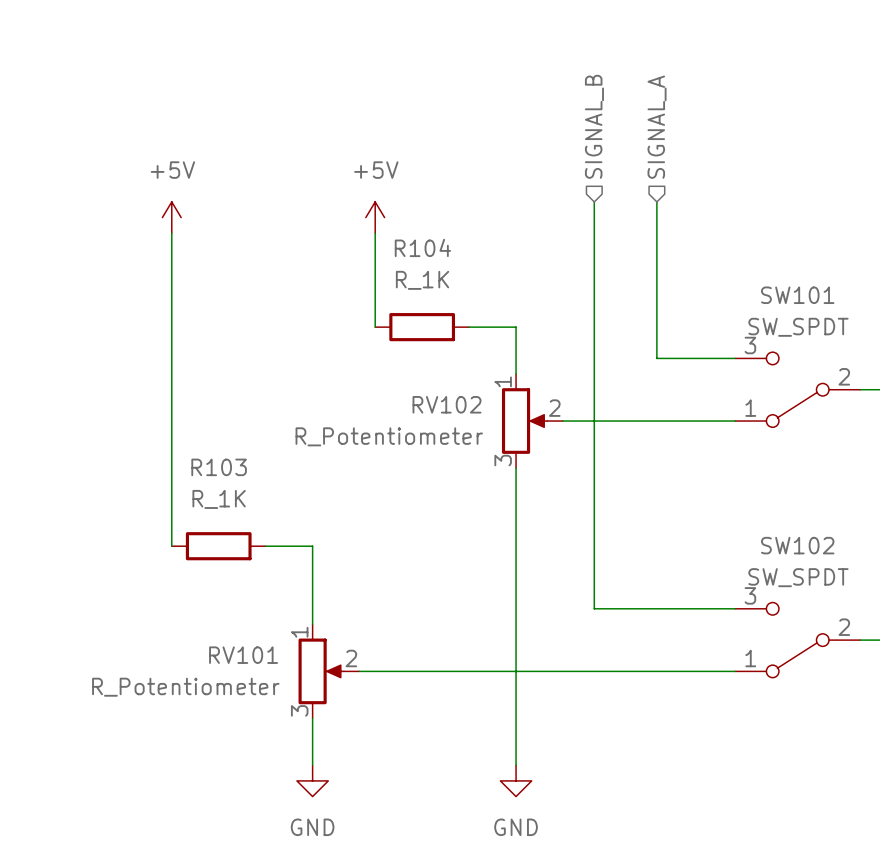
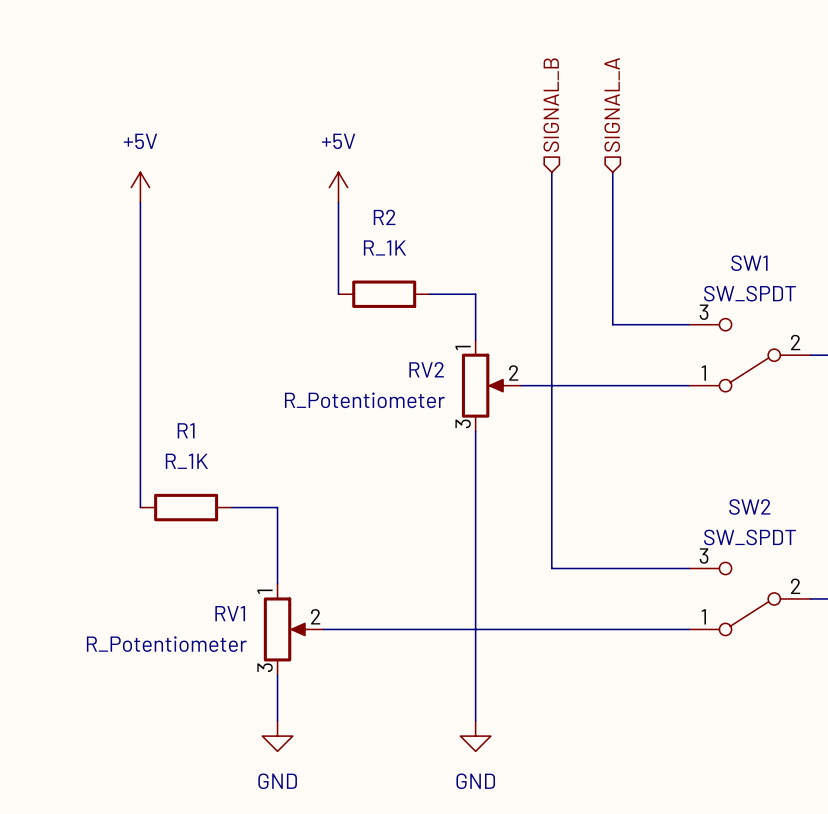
R104 name: R104 (422, 247) -> R2 (384, 217)
SW101 name: SW101 (797, 295) -> SW1 (749, 263)
RV102 name: RV102 (446, 404) -> RV2 (426, 369)
R103 name: R103 (219, 467) -> R1 (186, 430)
SW102 name: SW102 (797, 545) -> SW2 (749, 506)
RV101 name: RV101 (243, 655) -> RV1 (230, 613)

